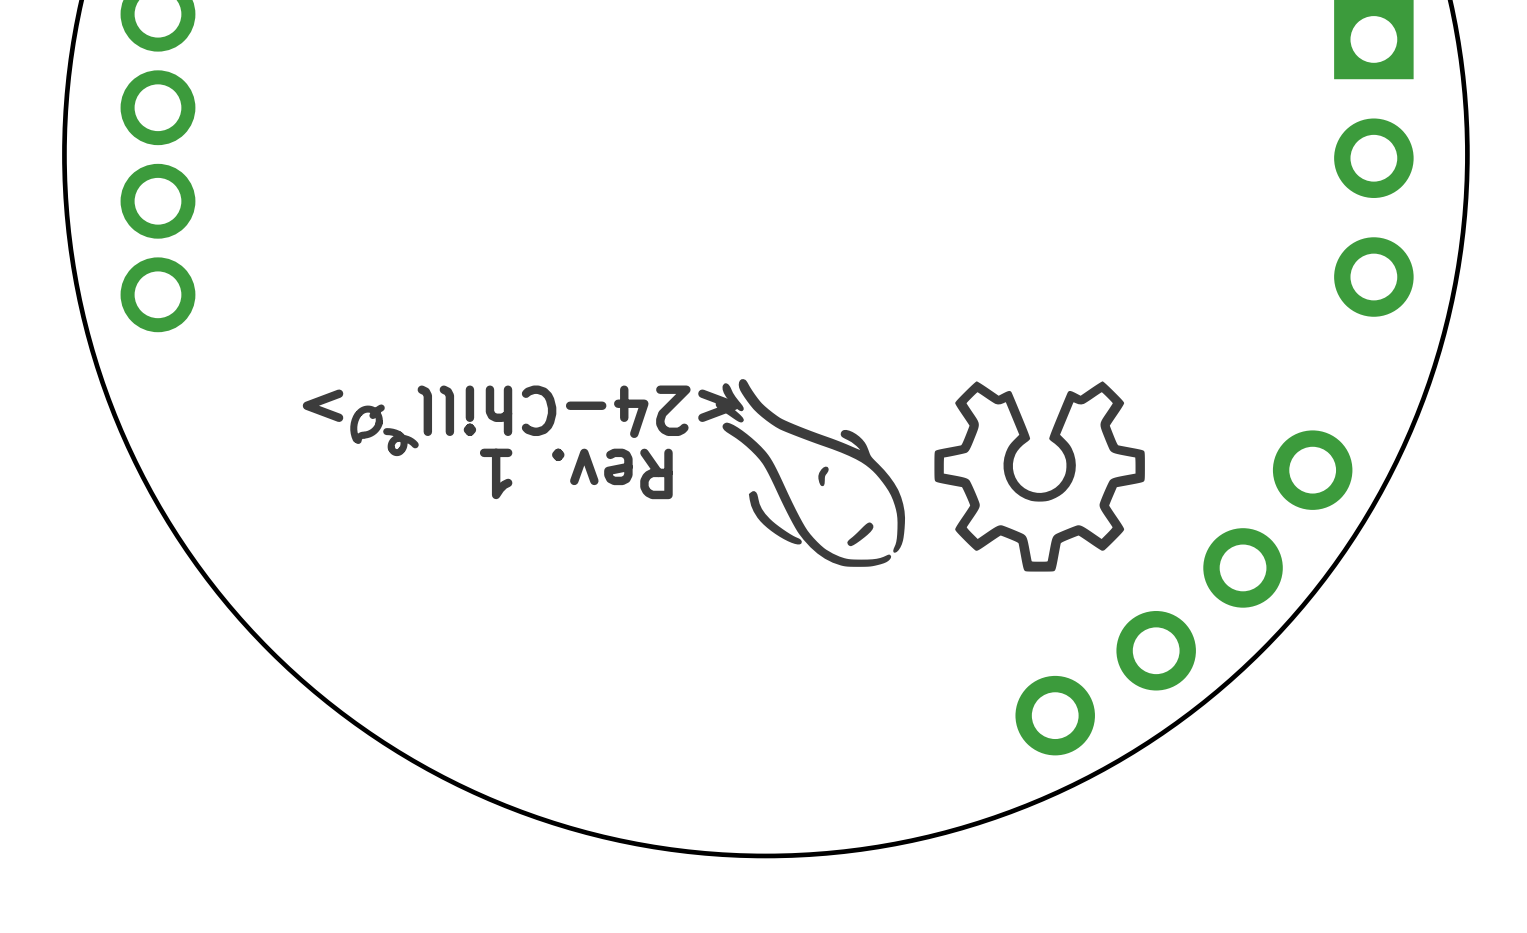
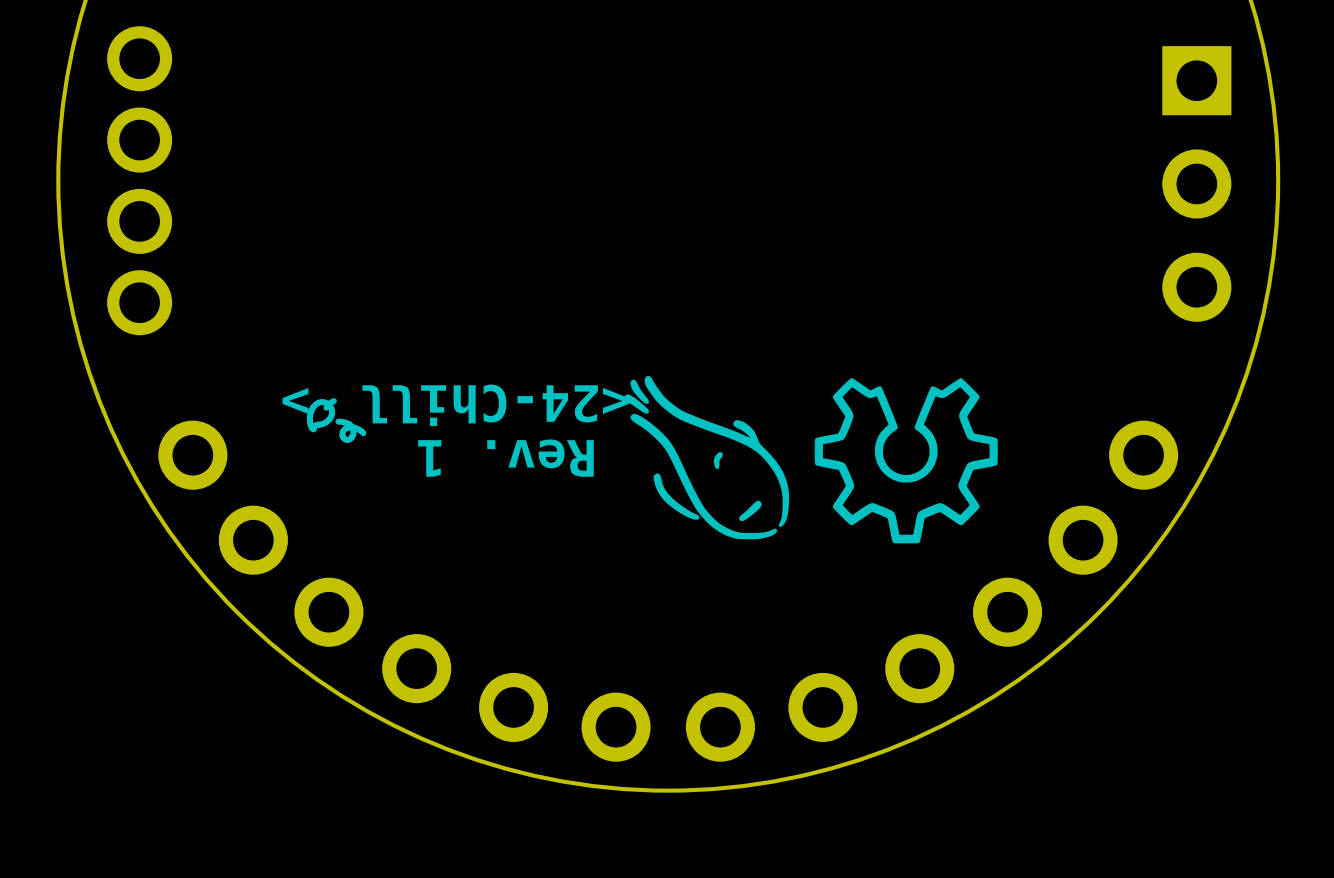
part: none -> (668, 591)

